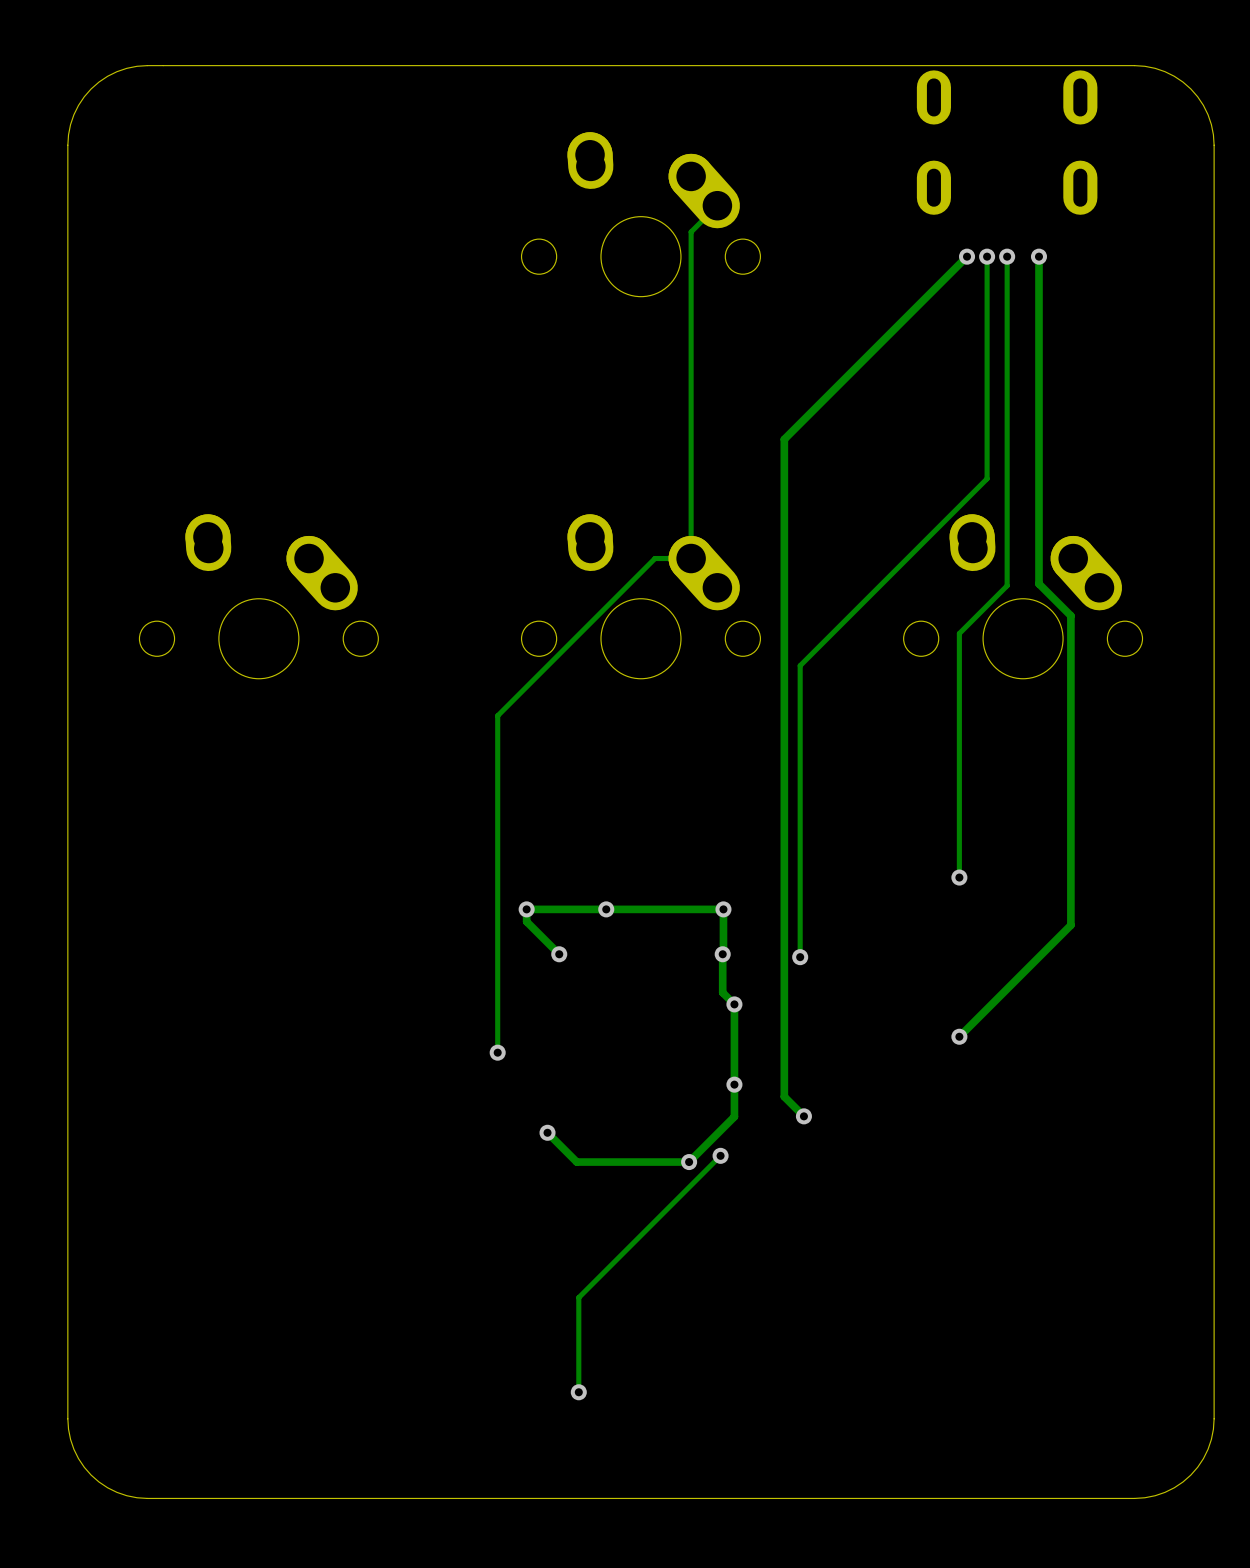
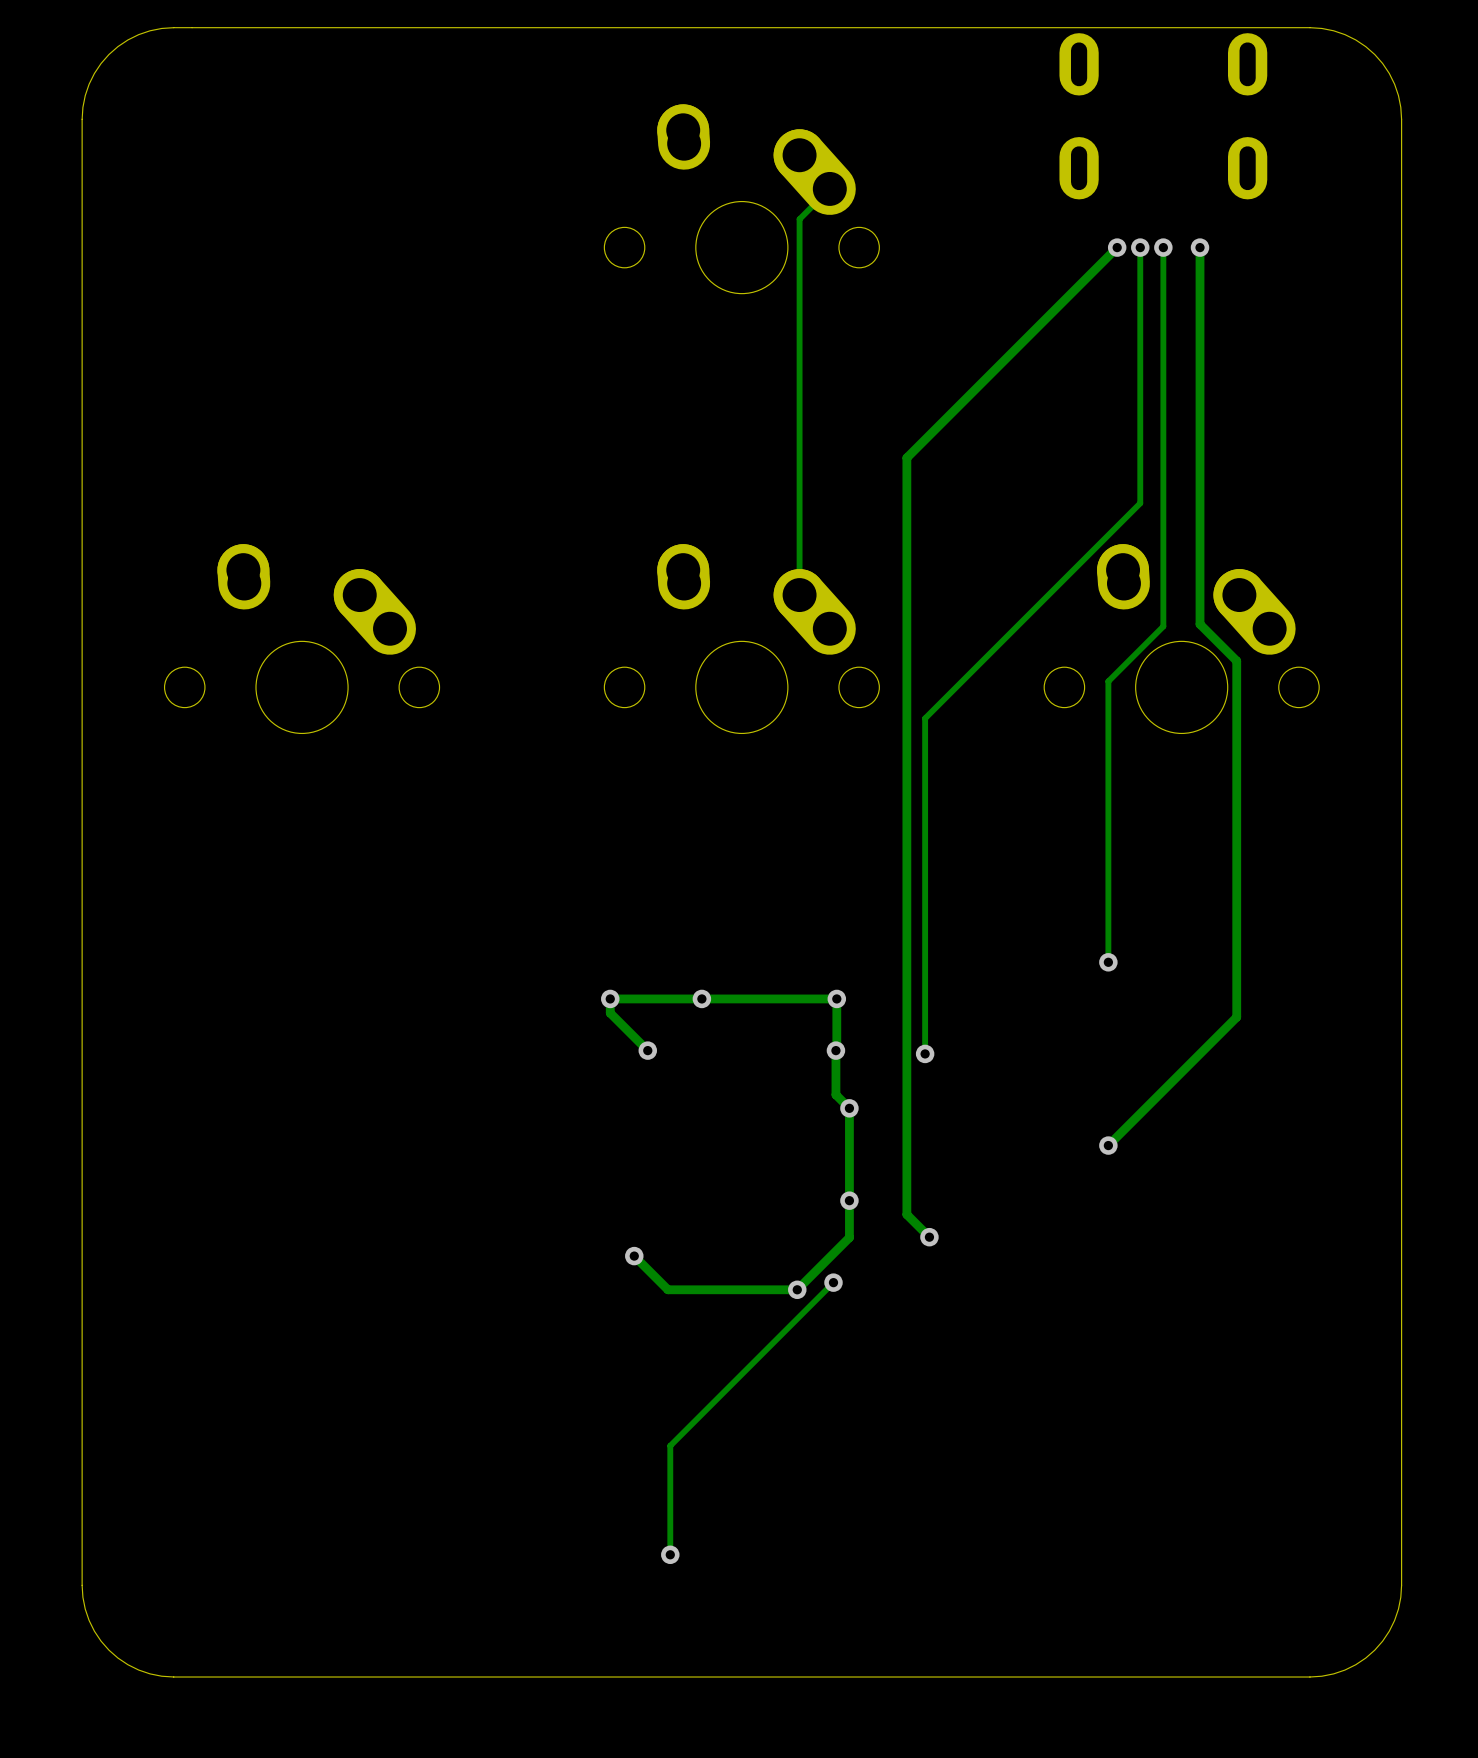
track: (691, 558) (655, 558) (497, 715) (497, 1052) -> none
via: (497, 1052) -> none

